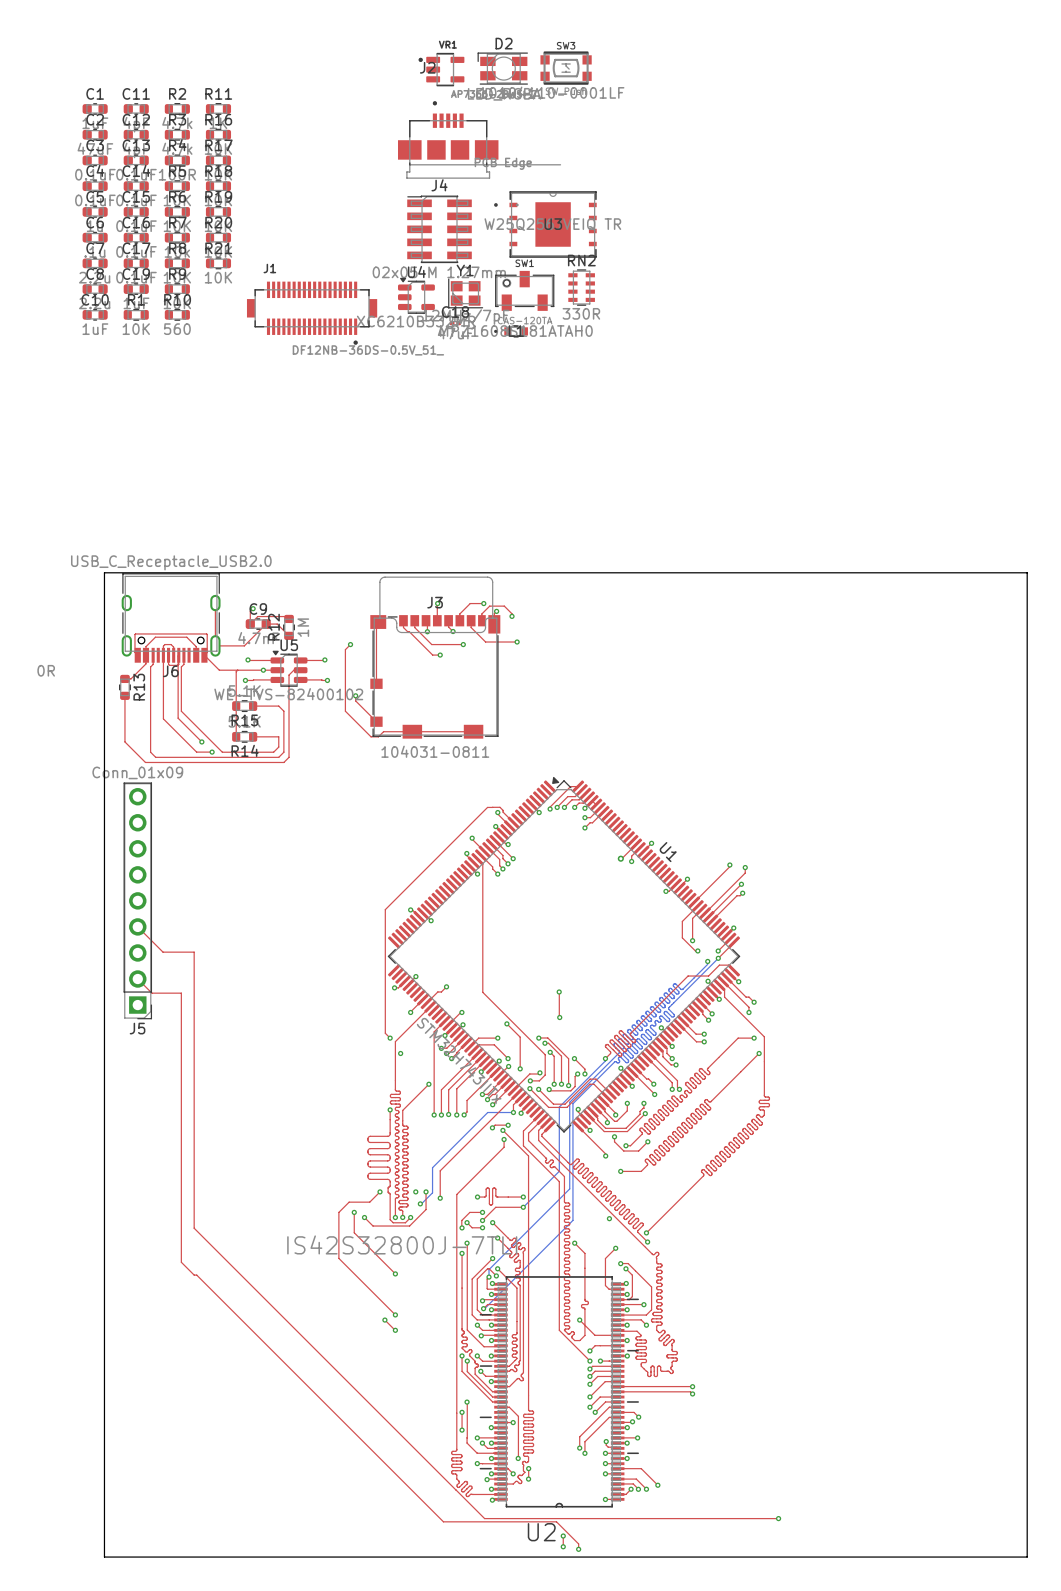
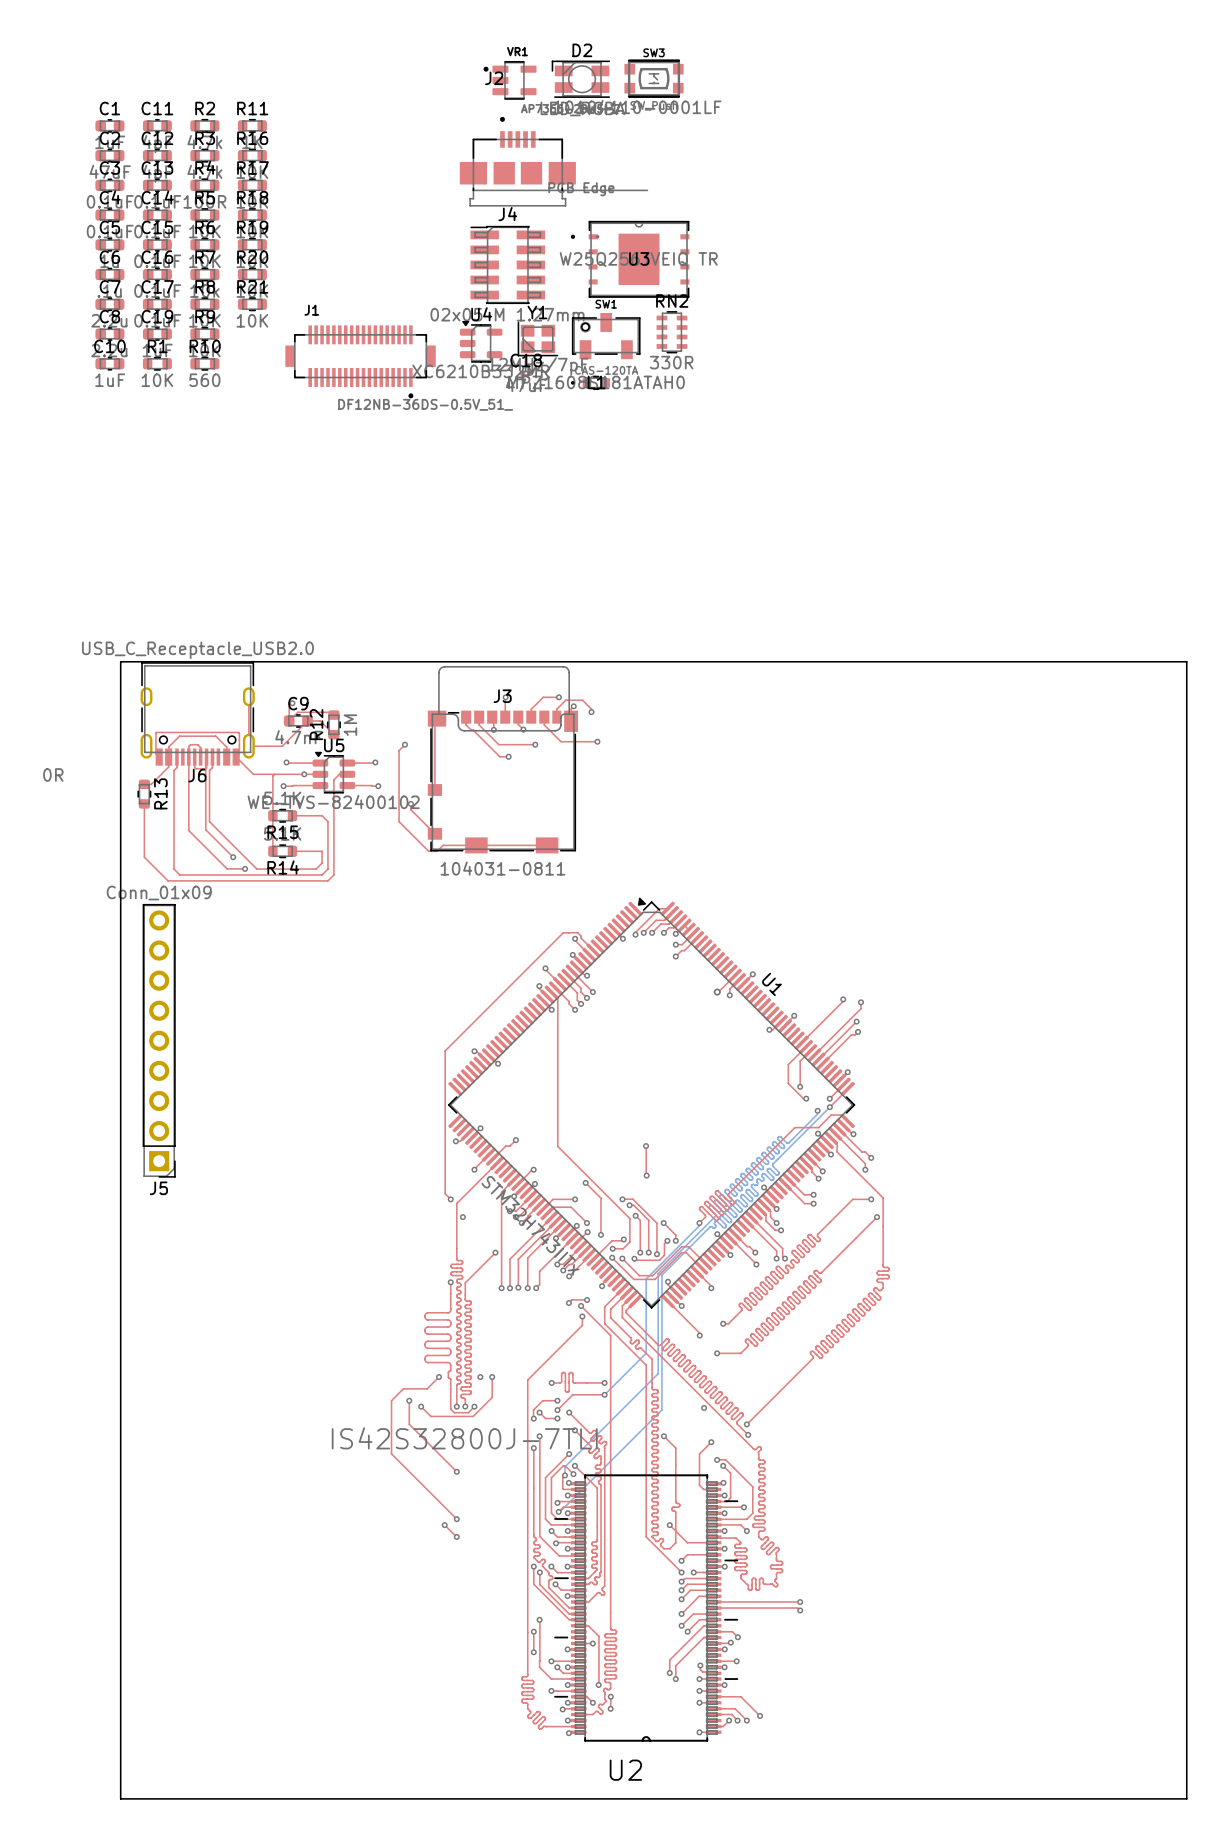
top track: (137, 926) (163, 952) (194, 952) (194, 1228) (484, 1518) (778, 1518) -> none
top track: (137, 979) (151, 993) (181, 993) (181, 1262) (194, 1275) (196, 1275) (443, 1521) (556, 1521) (578, 1543) (578, 1549) -> none
top track: (517, 1093) (440, 1170) (440, 1198) -> none
top track: (521, 1097) (513, 1104) (513, 1112) -> none
top track: (627, 1103) (627, 1110) (616, 1121) (614, 1121) (599, 1104) -> none
via: (627, 1103) -> none
top track: (643, 1103) (643, 1108) (640, 1111) (640, 1114) (626, 1128) (605, 1128) (592, 1111) -> none
via: (643, 1103) -> none
top track: (596, 1108) (607, 1119) (607, 1122) -> none
bottom track: (513, 1112) (487, 1112) (432, 1167) (432, 1192) (420, 1203) -> none
via: (513, 1112) -> none
top track: (645, 1113) (627, 1131) (604, 1131) (588, 1115) -> none
via: (645, 1113) -> none
via: (607, 1122) -> none
top track: (614, 1136) (614, 1141) (623, 1151) (638, 1151) (647, 1141) -> none
via: (614, 1136) -> none
via: (647, 1141) -> none
via: (440, 1198) -> none
via: (420, 1203) -> none
via: (778, 1518) -> none
top track: (563, 1536) (563, 1546) -> none
via: (563, 1536) -> none
via: (563, 1546) -> none
via: (578, 1549) -> none

